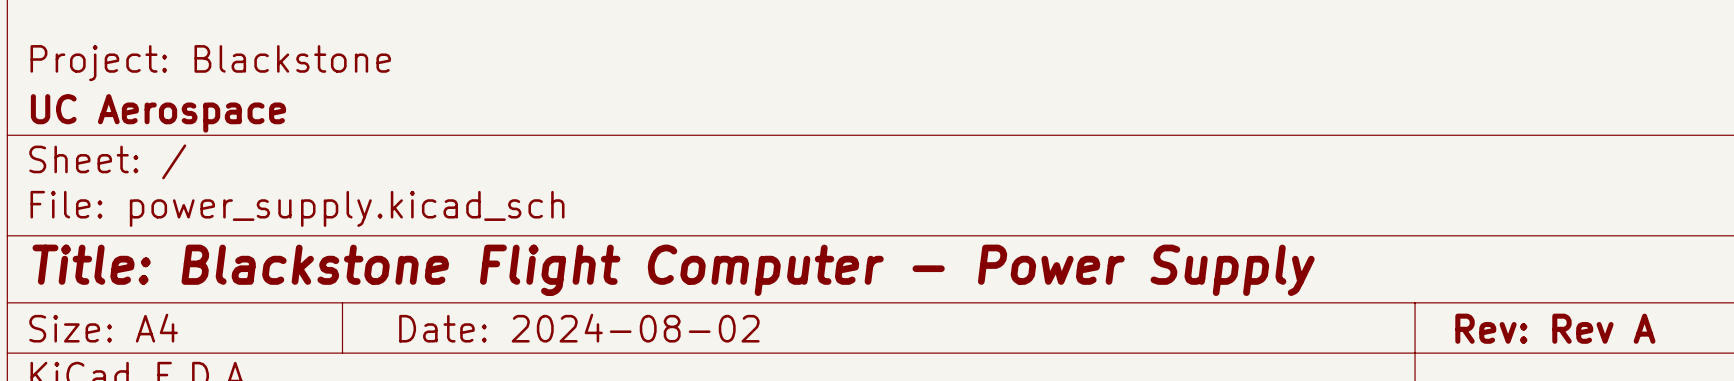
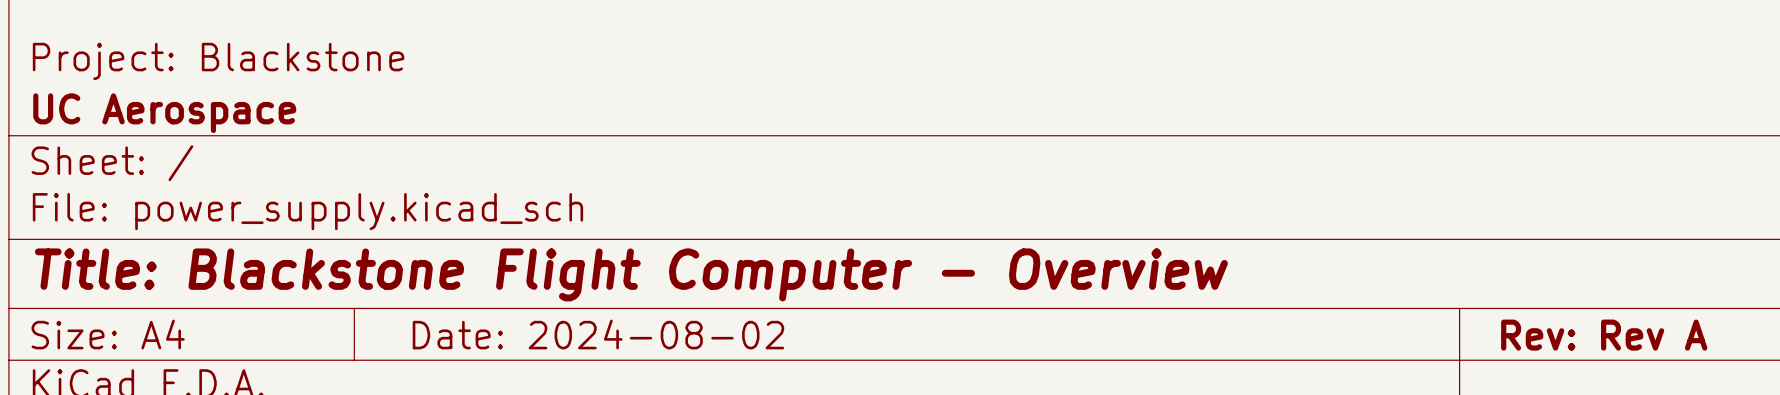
title block: Title: Blackstone Flight Computer - Power Supply (673, 270) -> Title: Blackstone Flight Computer - Overview (631, 274)

